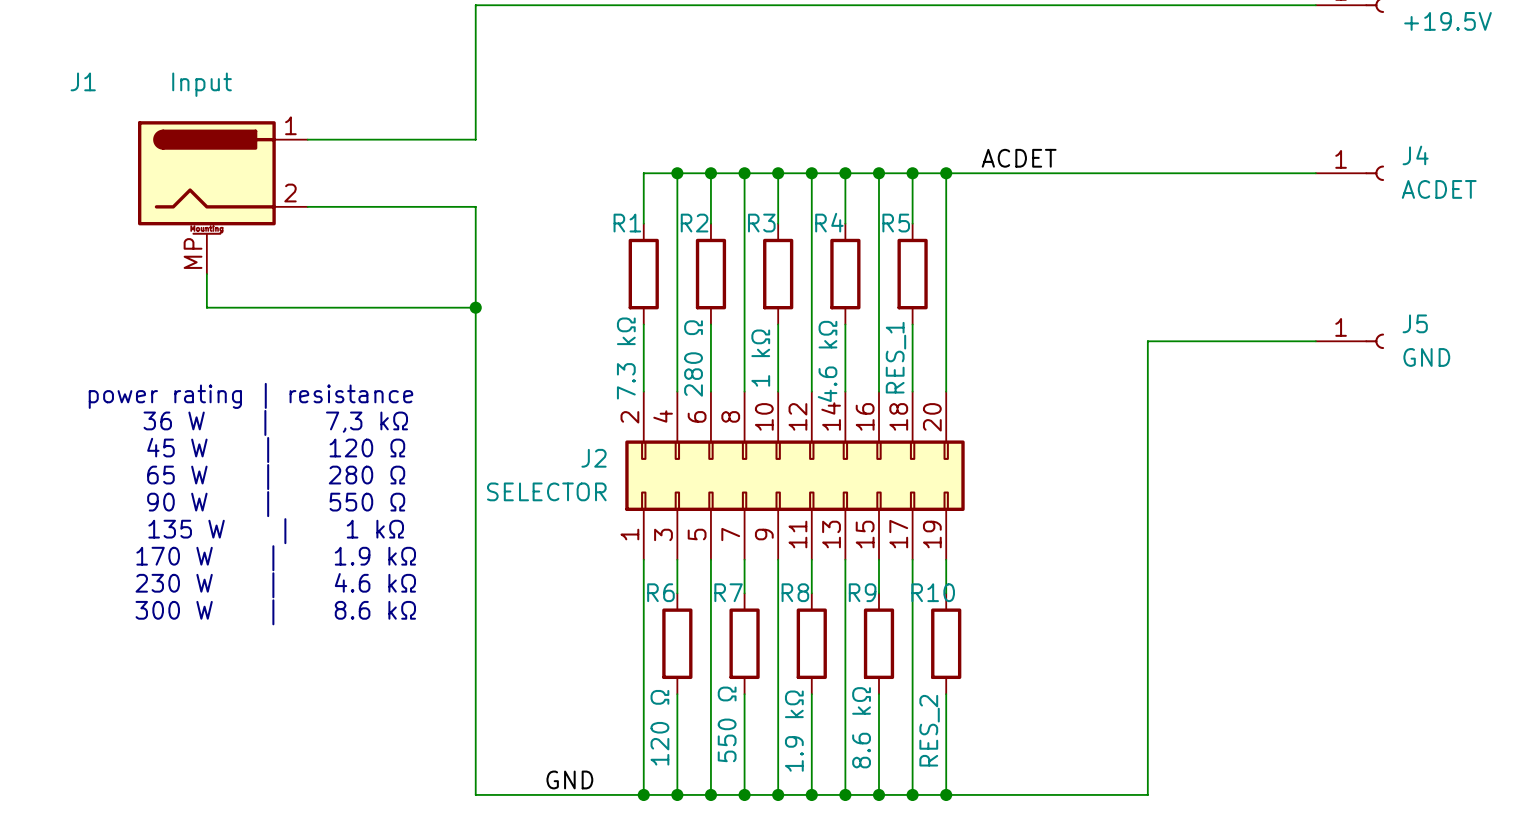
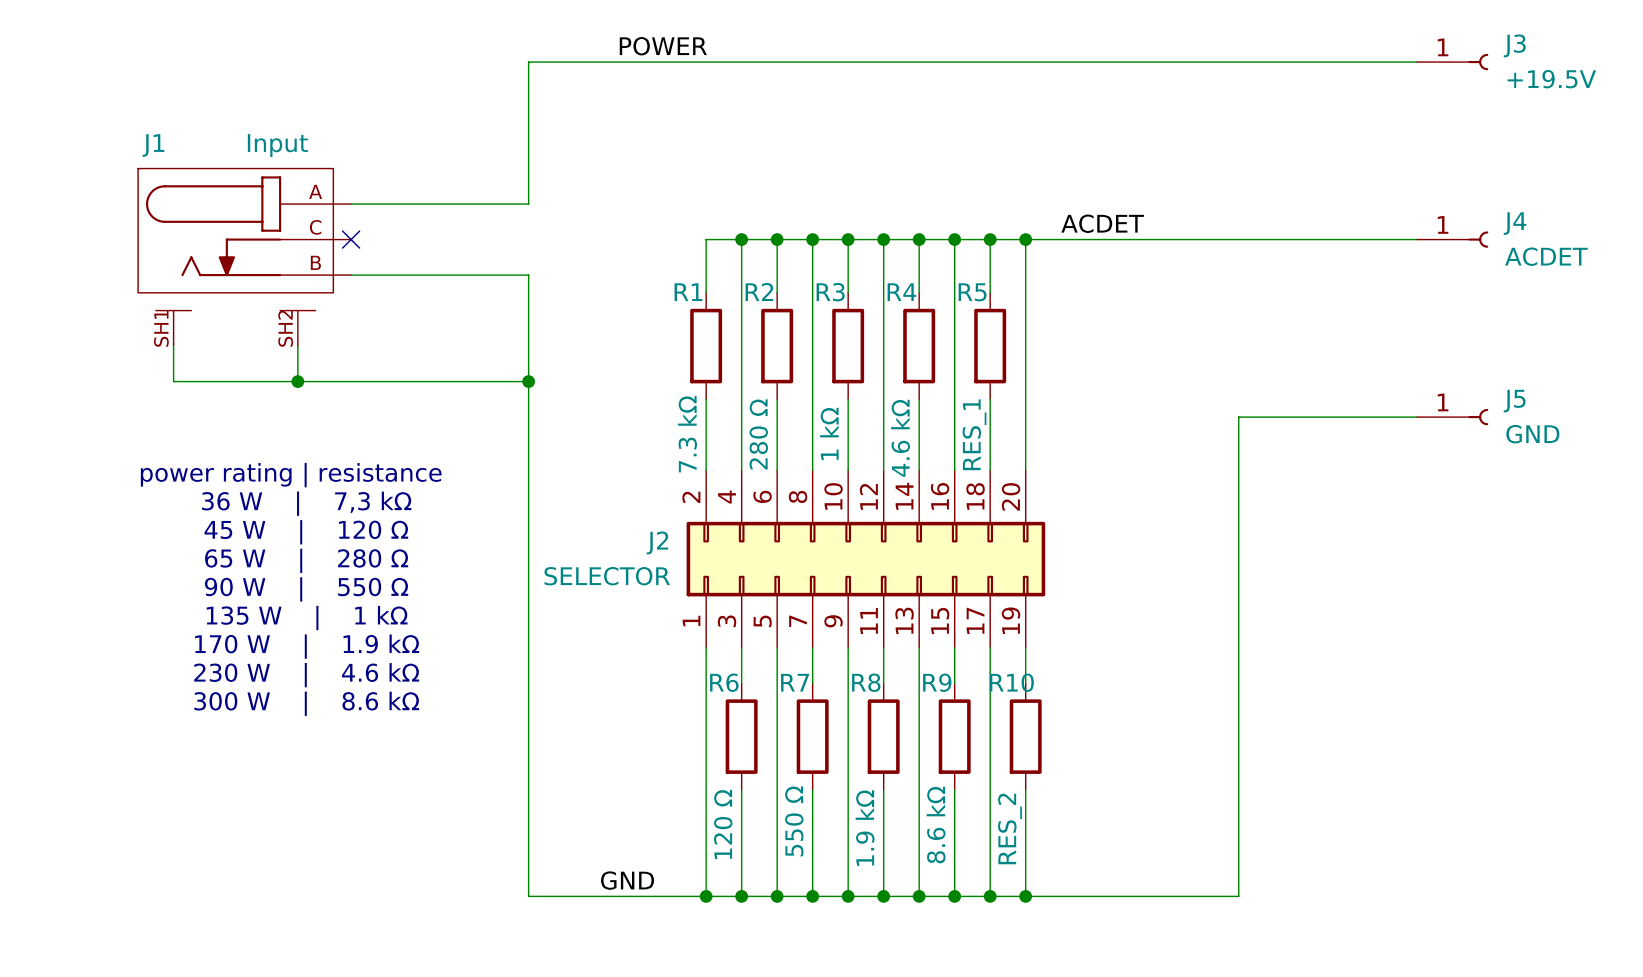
J1 name position: J1 (83, 81) -> J1 (153, 145)
J1 value position: Input (202, 84) -> Input (277, 145)
J1 symbol: [137, 121, 308, 275] -> [138, 168, 352, 347]
no-connect mark: none -> (351, 239)
wire: (206, 274) (206, 307) -> (173, 346) (173, 381) (244, 381)
wire: none -> (297, 346) (297, 381)
junction: none -> (297, 381)

